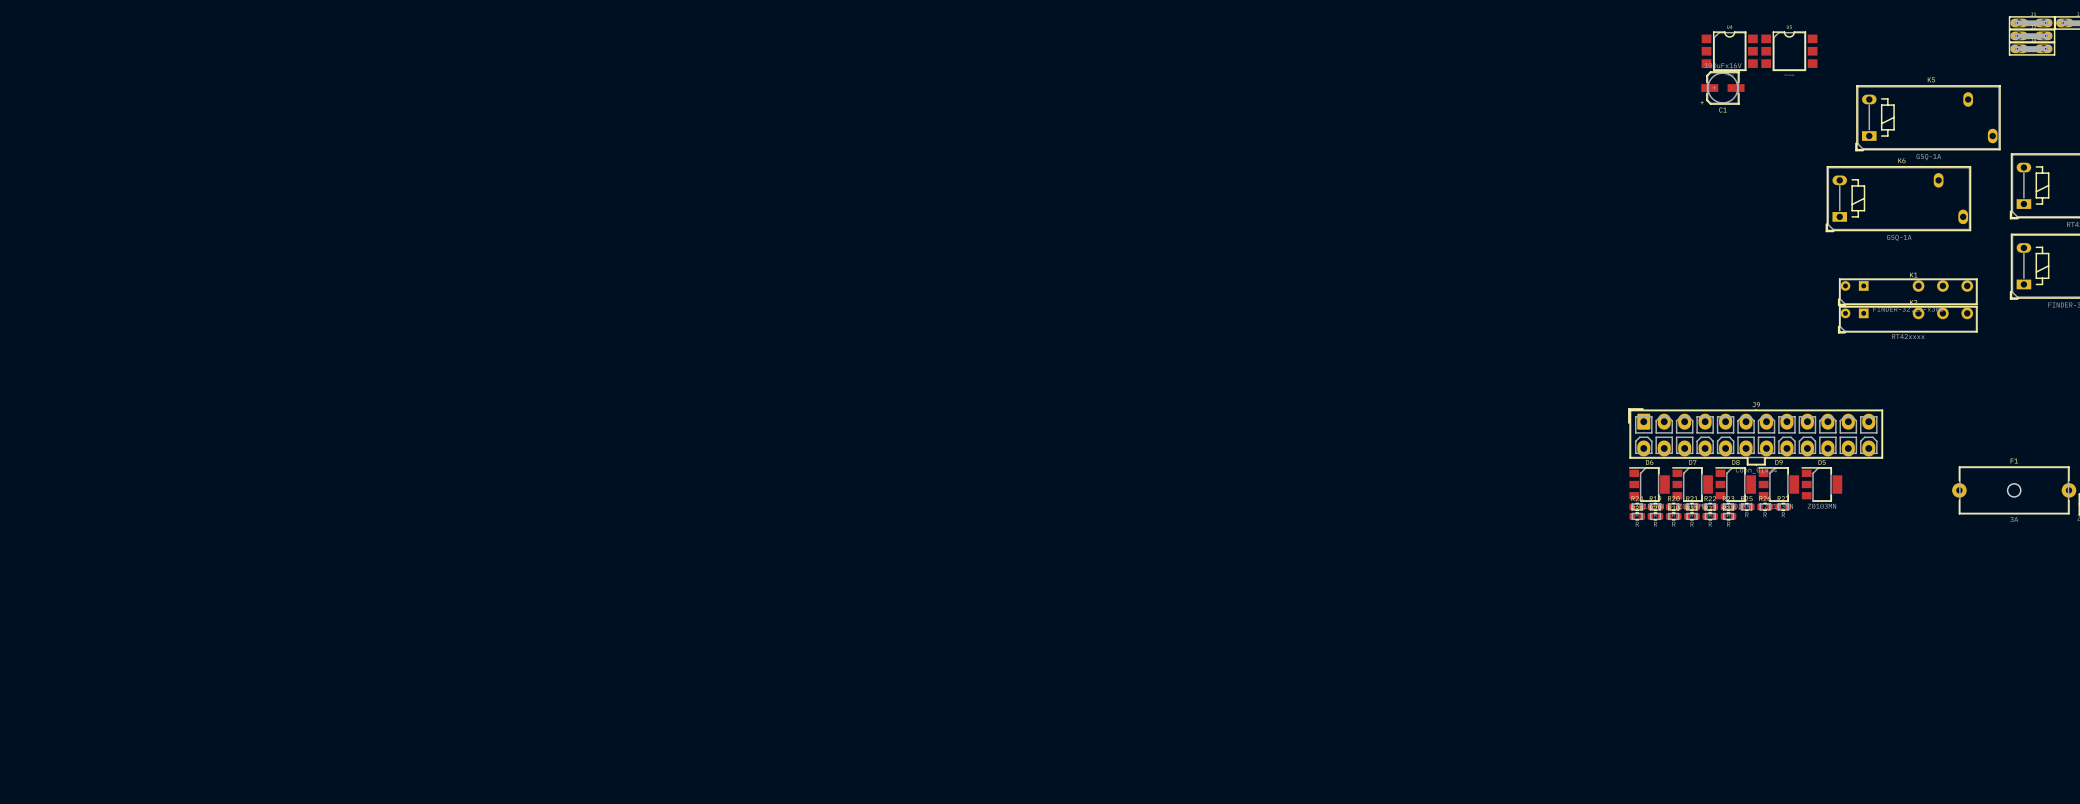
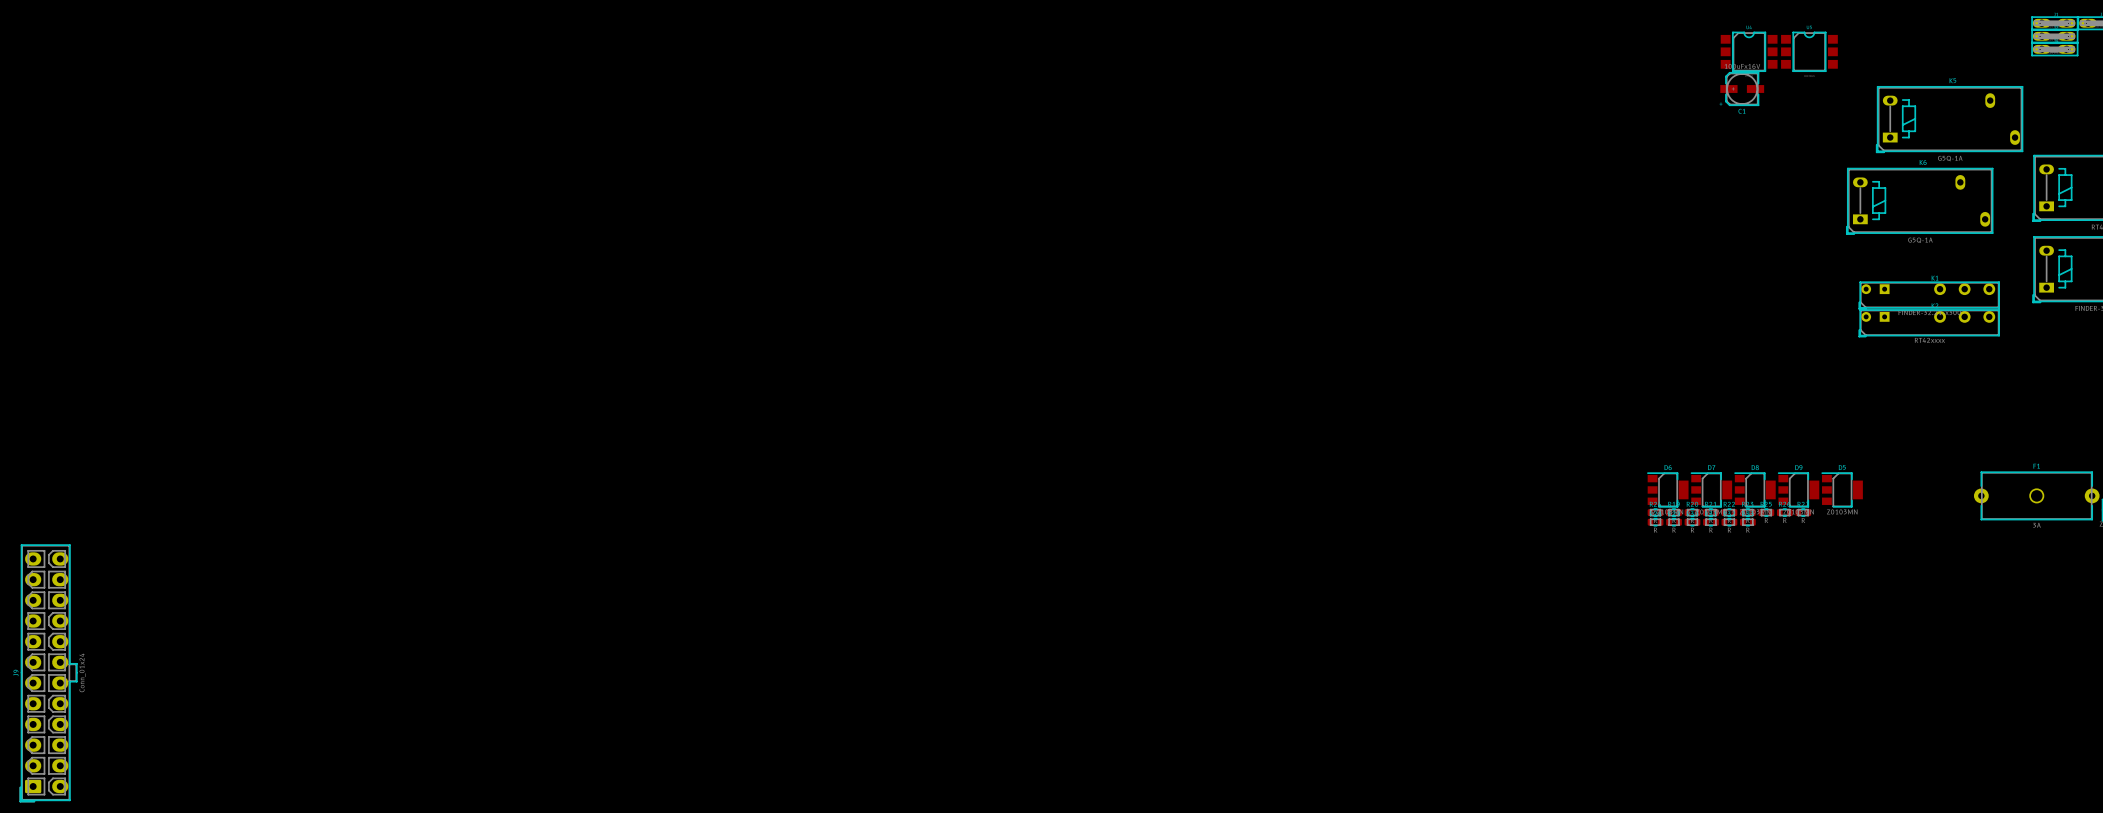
part rotation: 0° (1755, 436) -> 90° counterclockwise (48, 673)
part position: (1755, 436) -> (48, 673)

